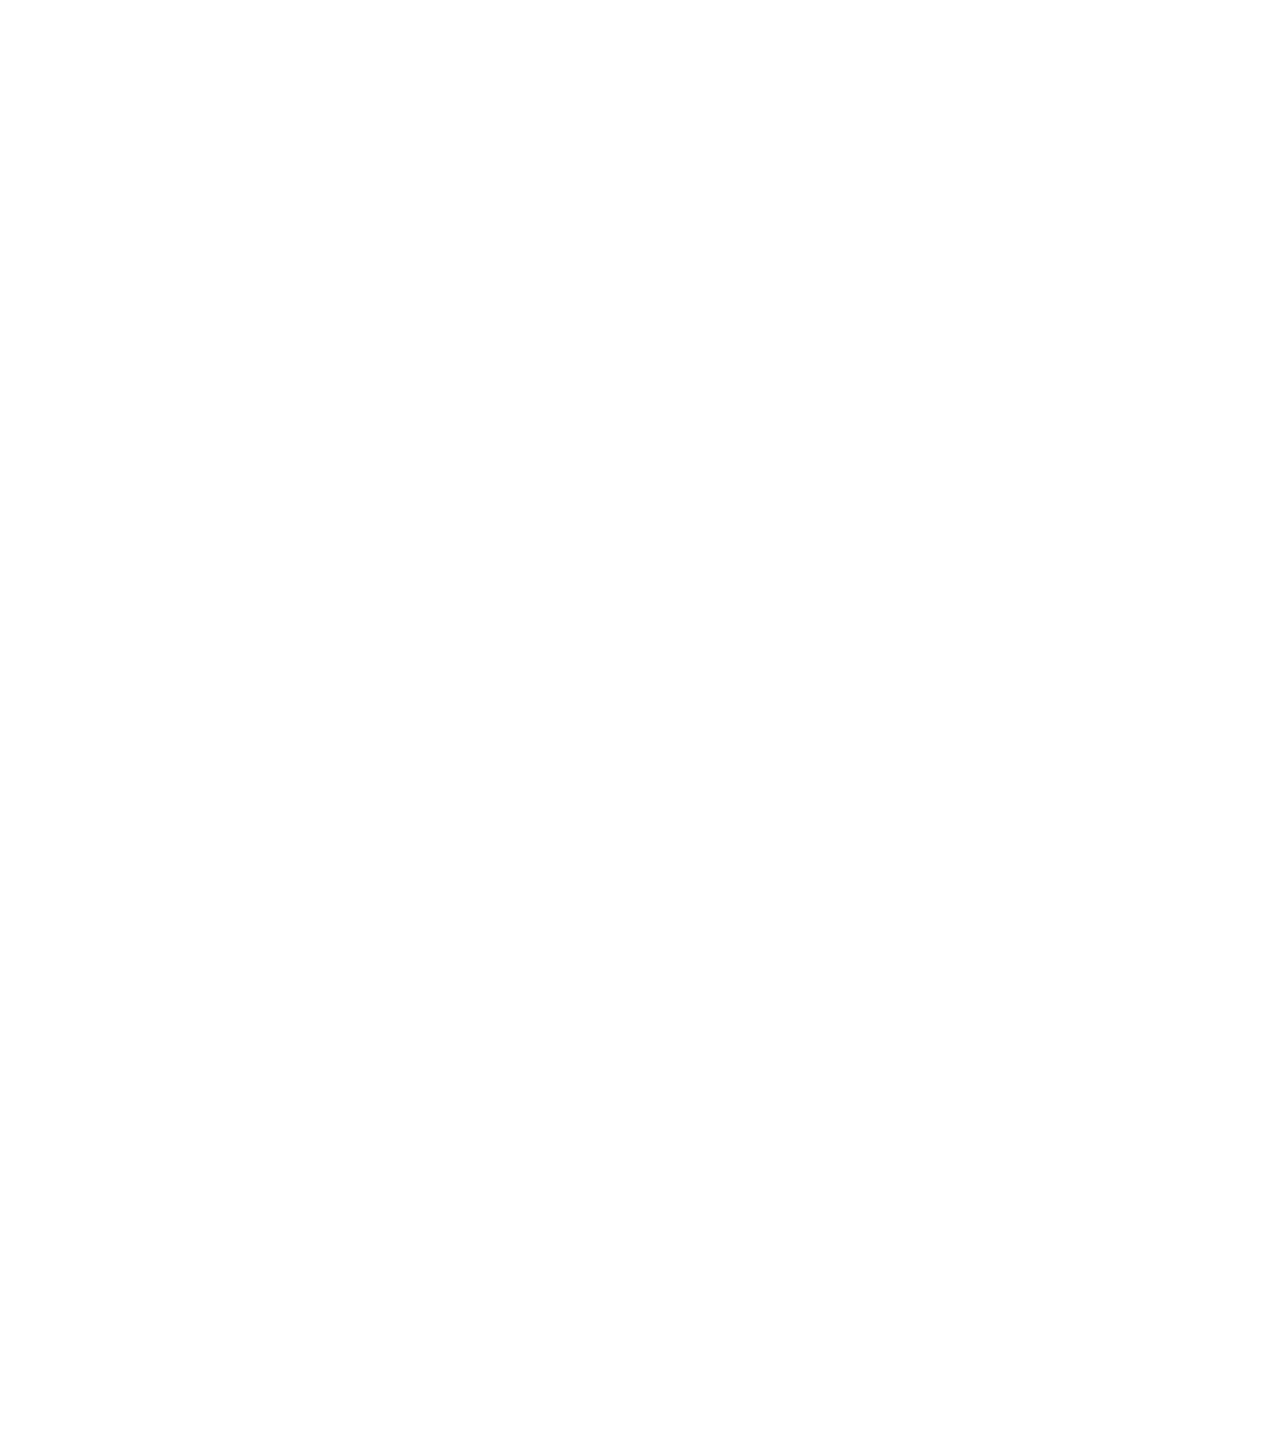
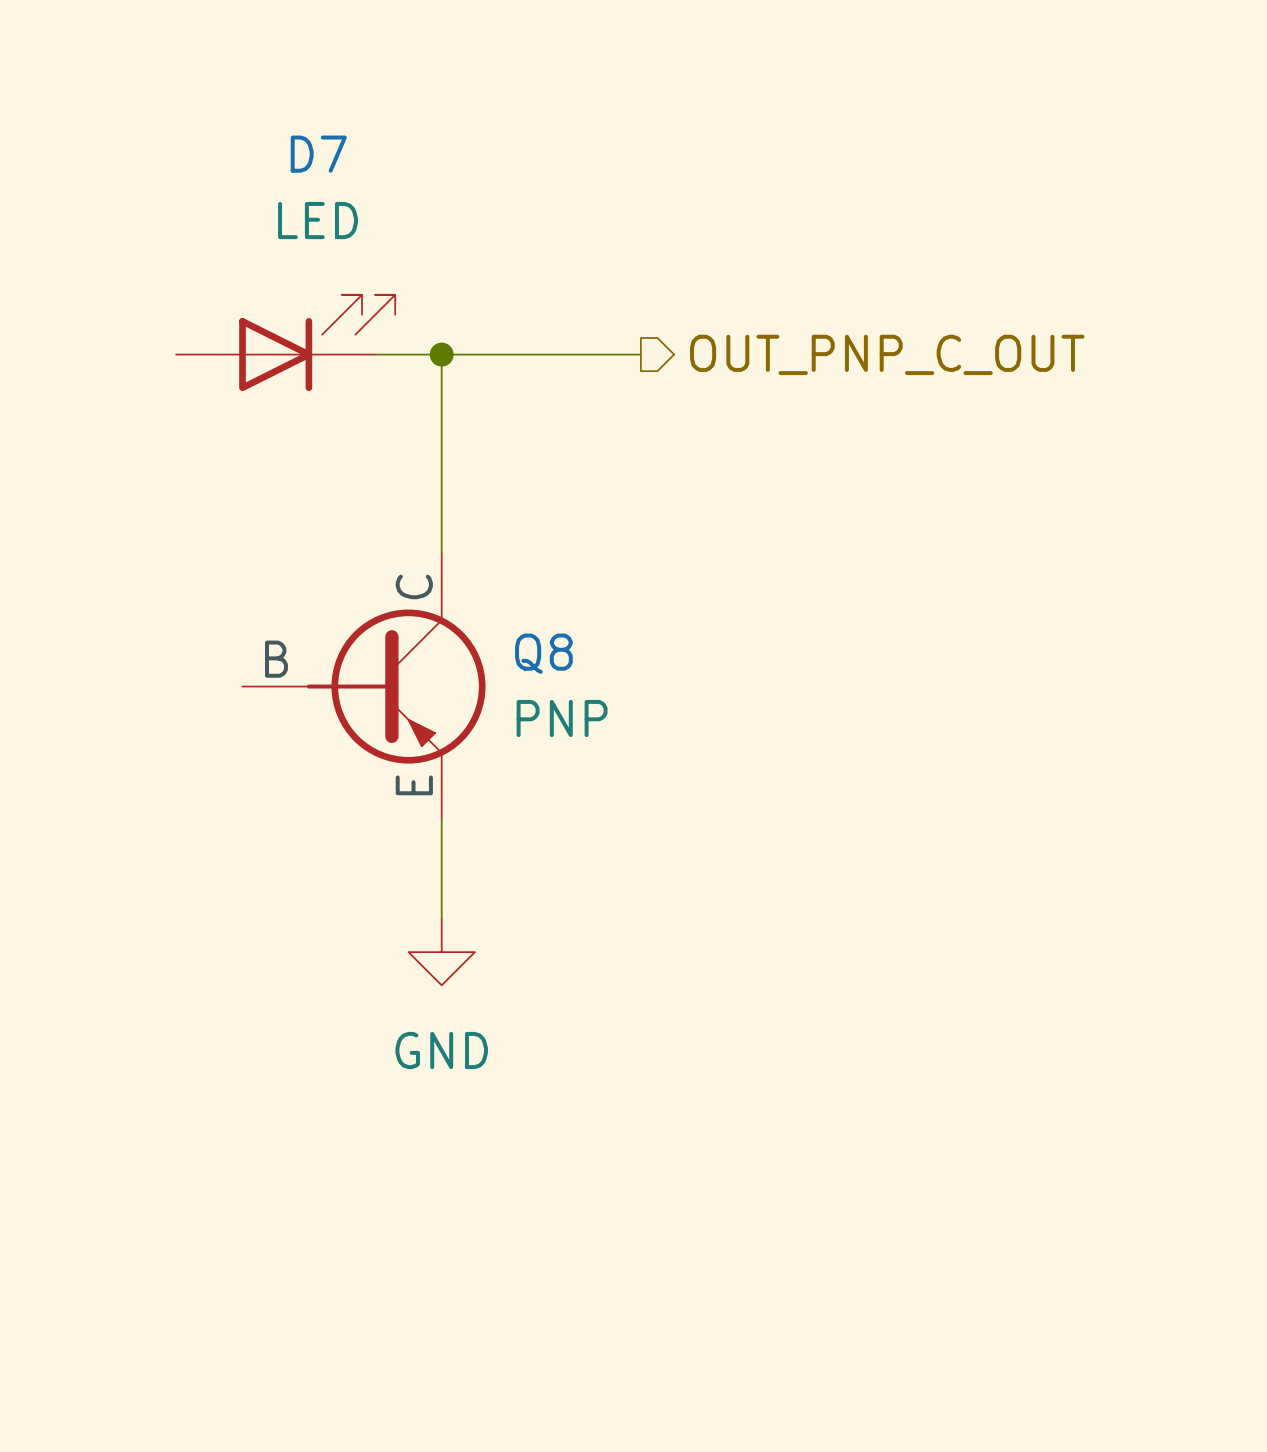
D7: none -> LED (285, 342)
wire: none -> (375, 354) (640, 354)
wire: none -> (441, 354) (441, 553)
junction: none -> (441, 354)
hierarchical label: none -> OUT_PNP_C_OUT (887, 354)
Q8: none -> PNP (364, 686)
wire: none -> (441, 819) (441, 918)
power symbol: none -> GND (441, 952)

